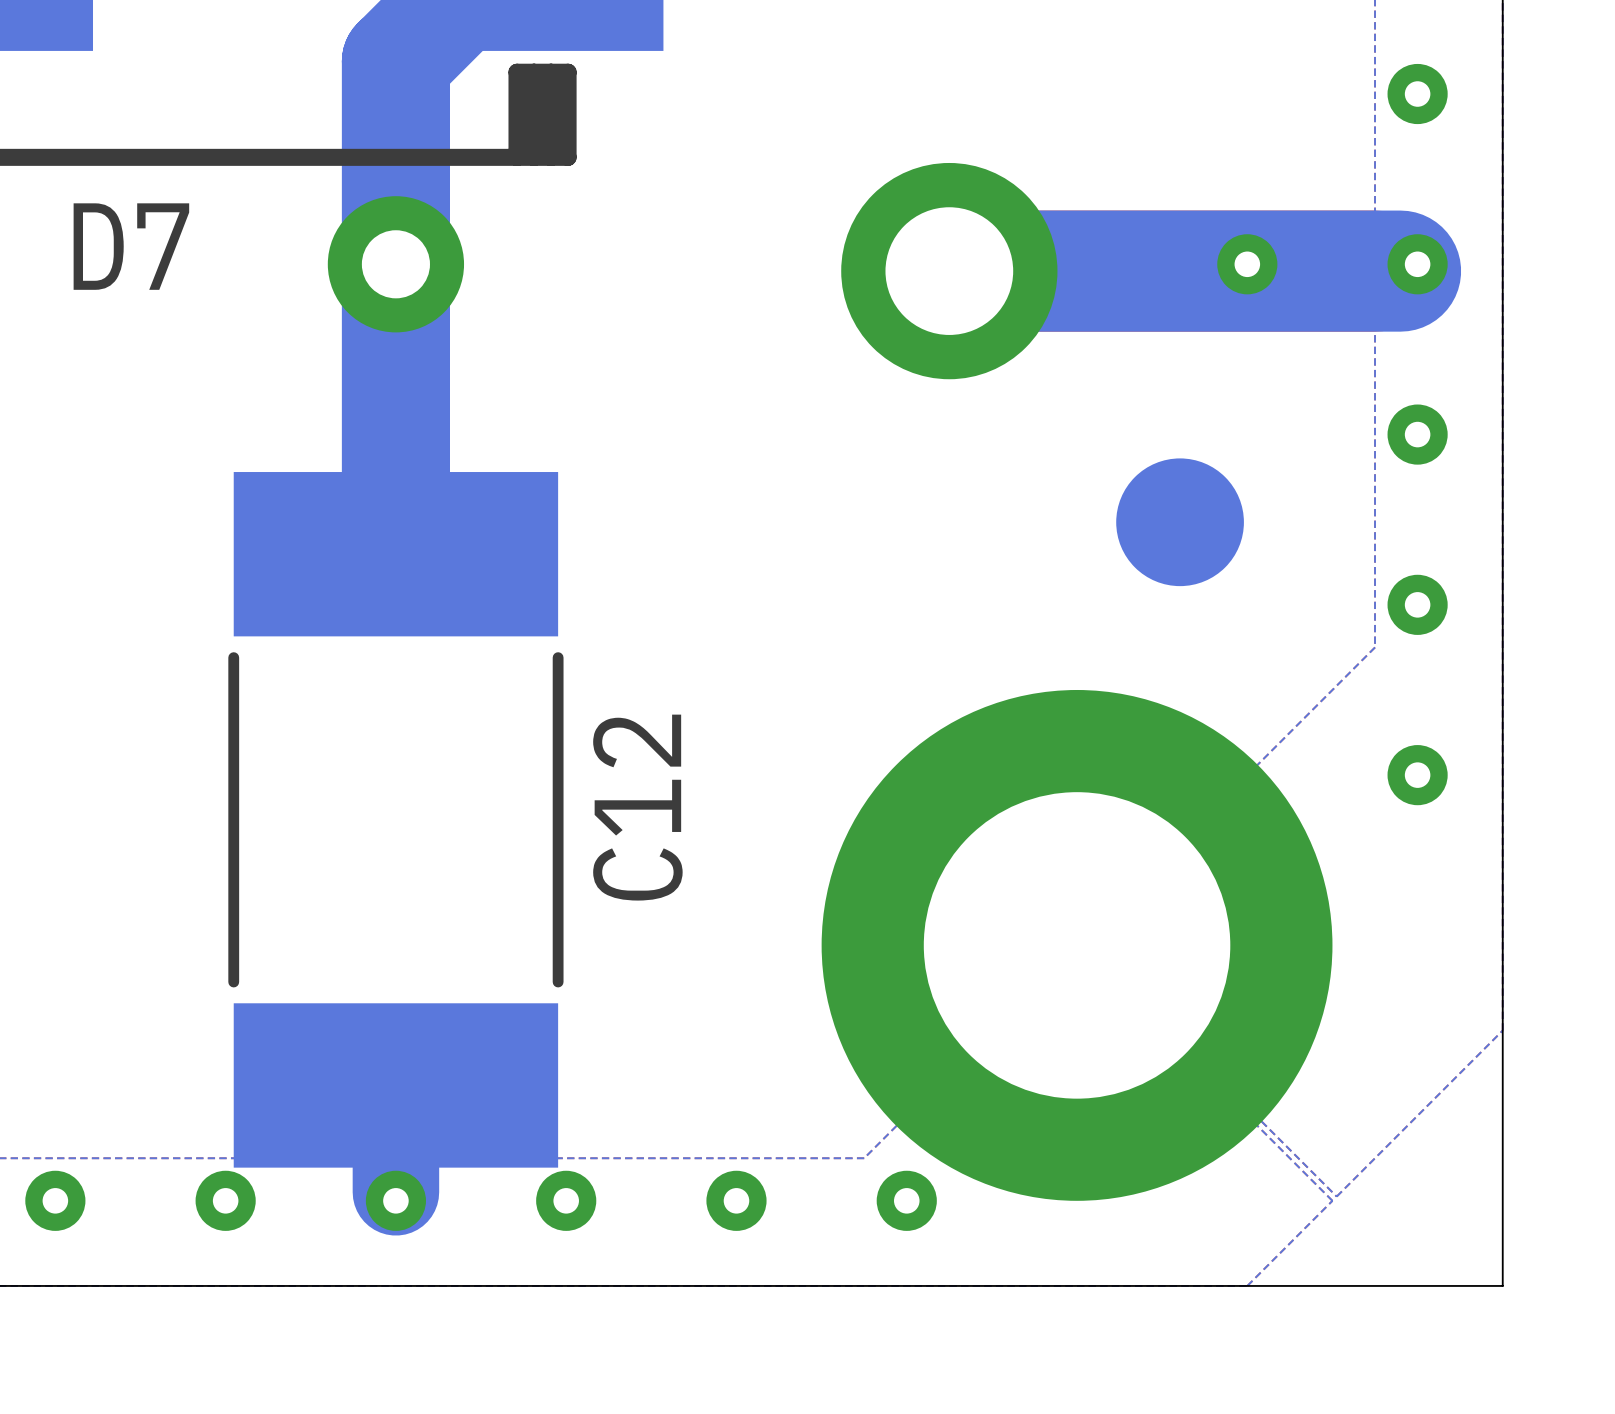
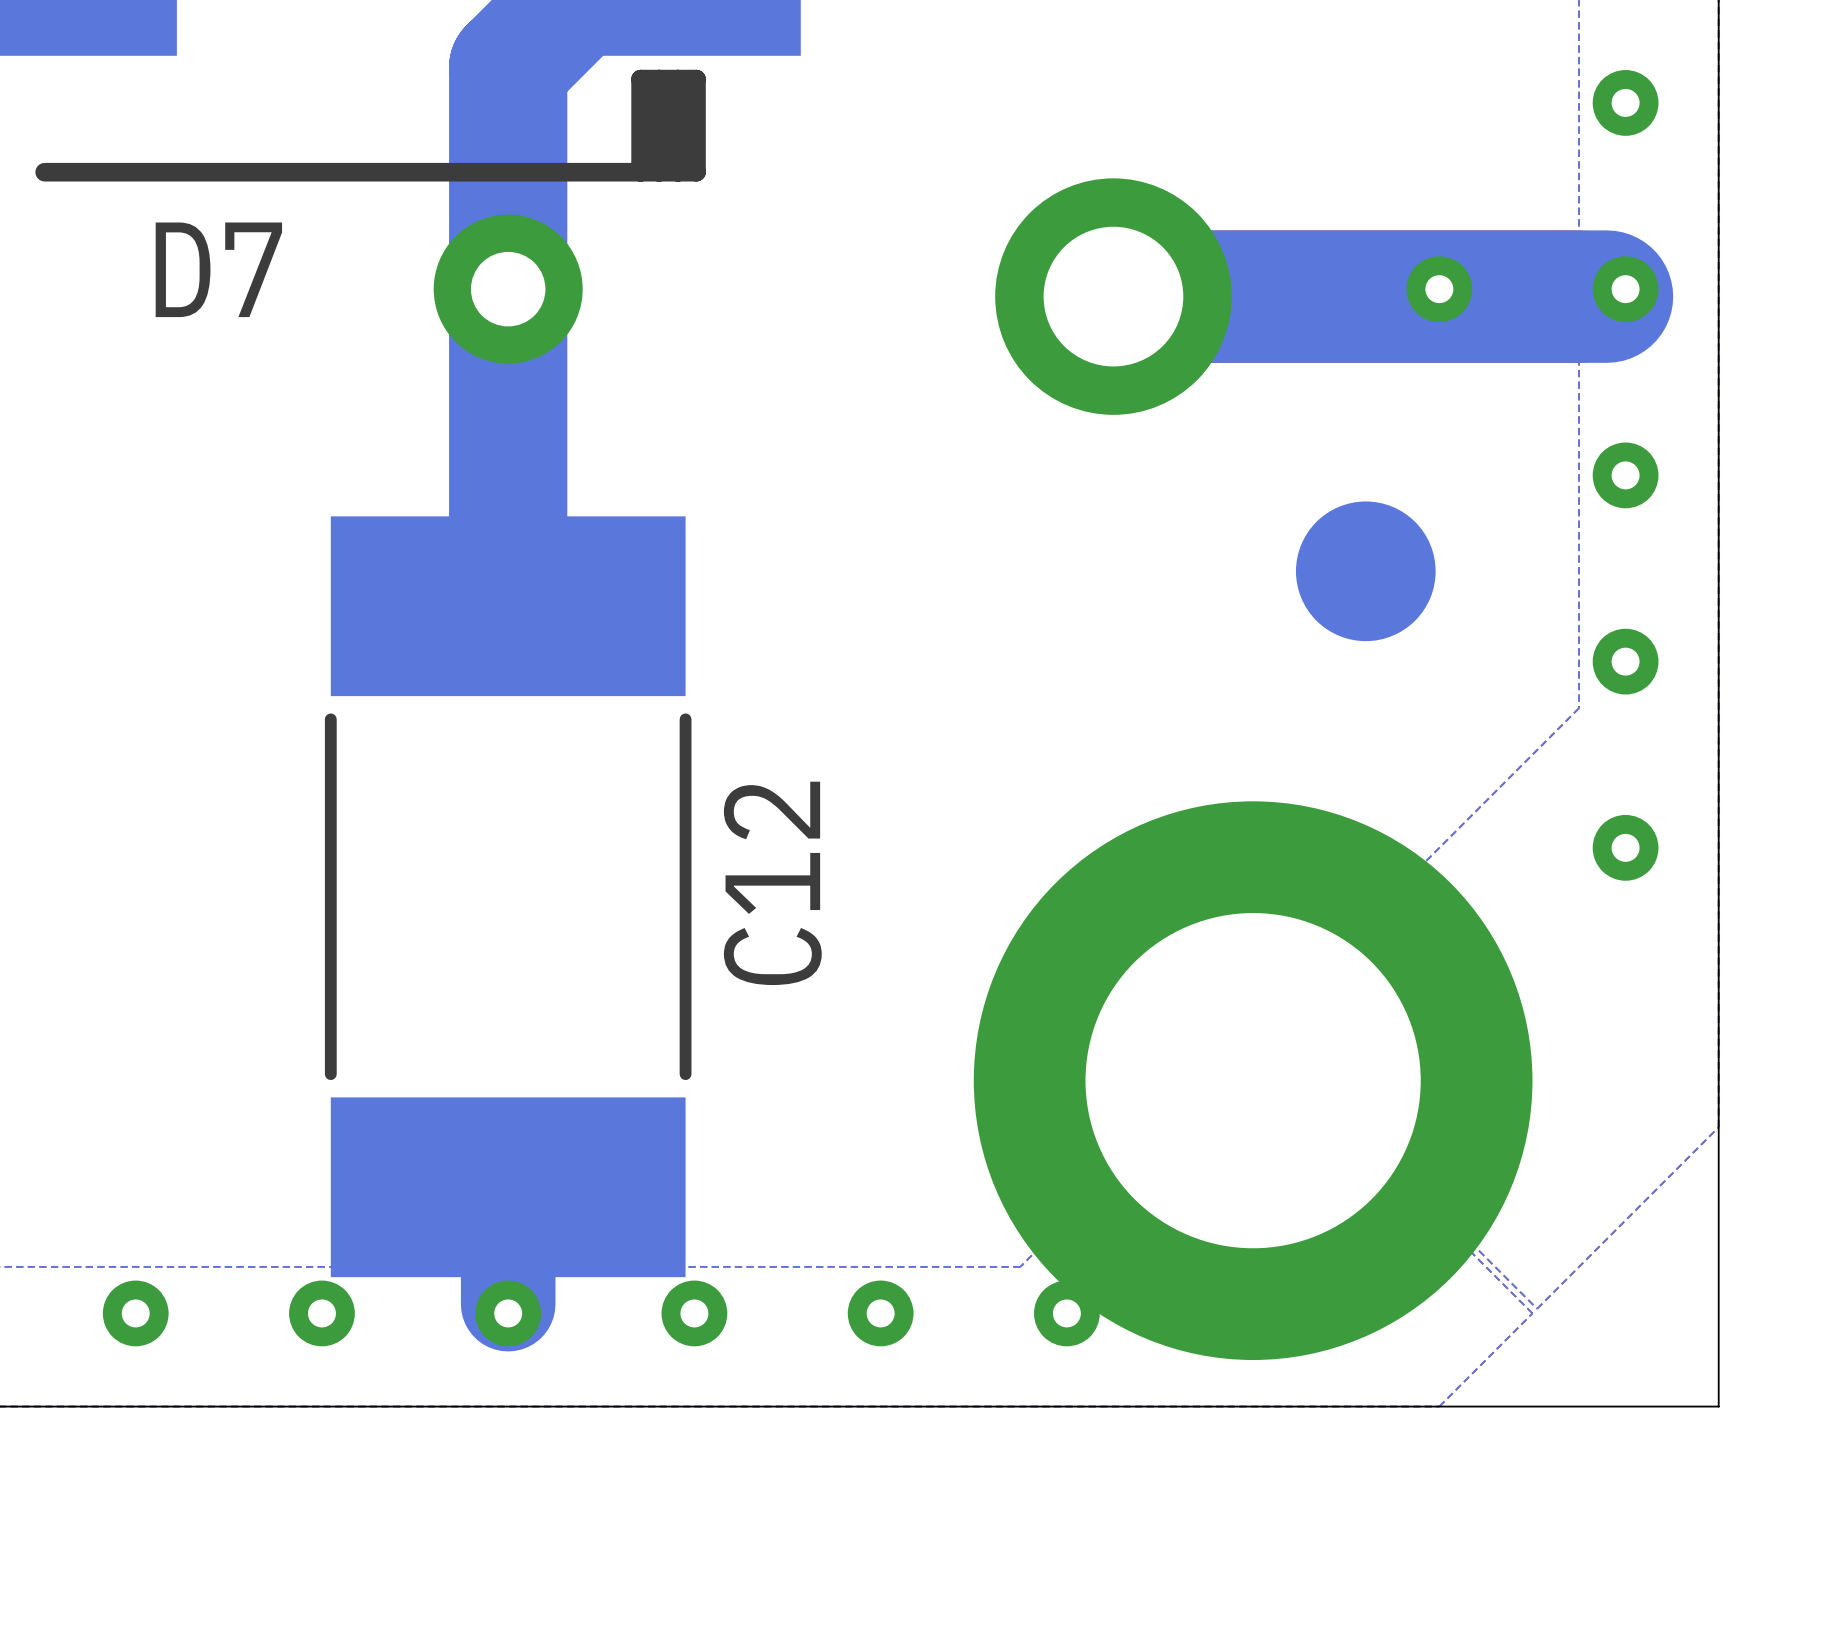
part position: (1077, 945) -> (1253, 1080)

